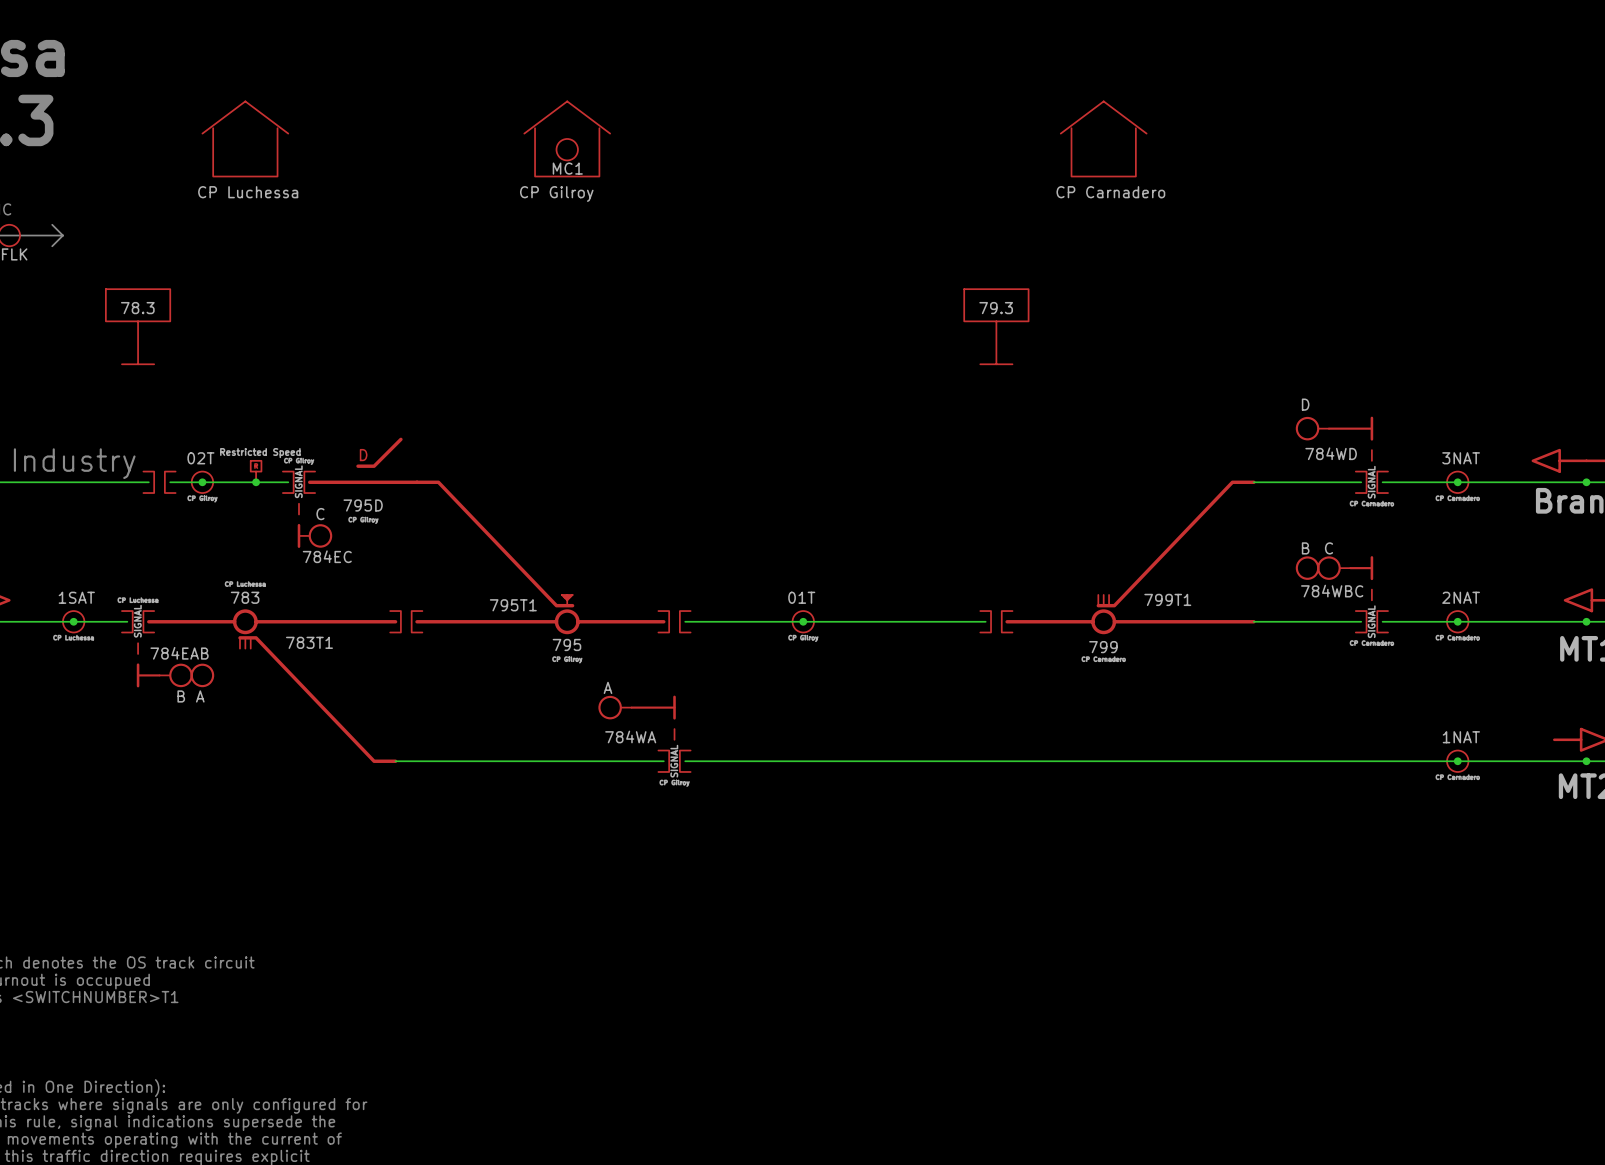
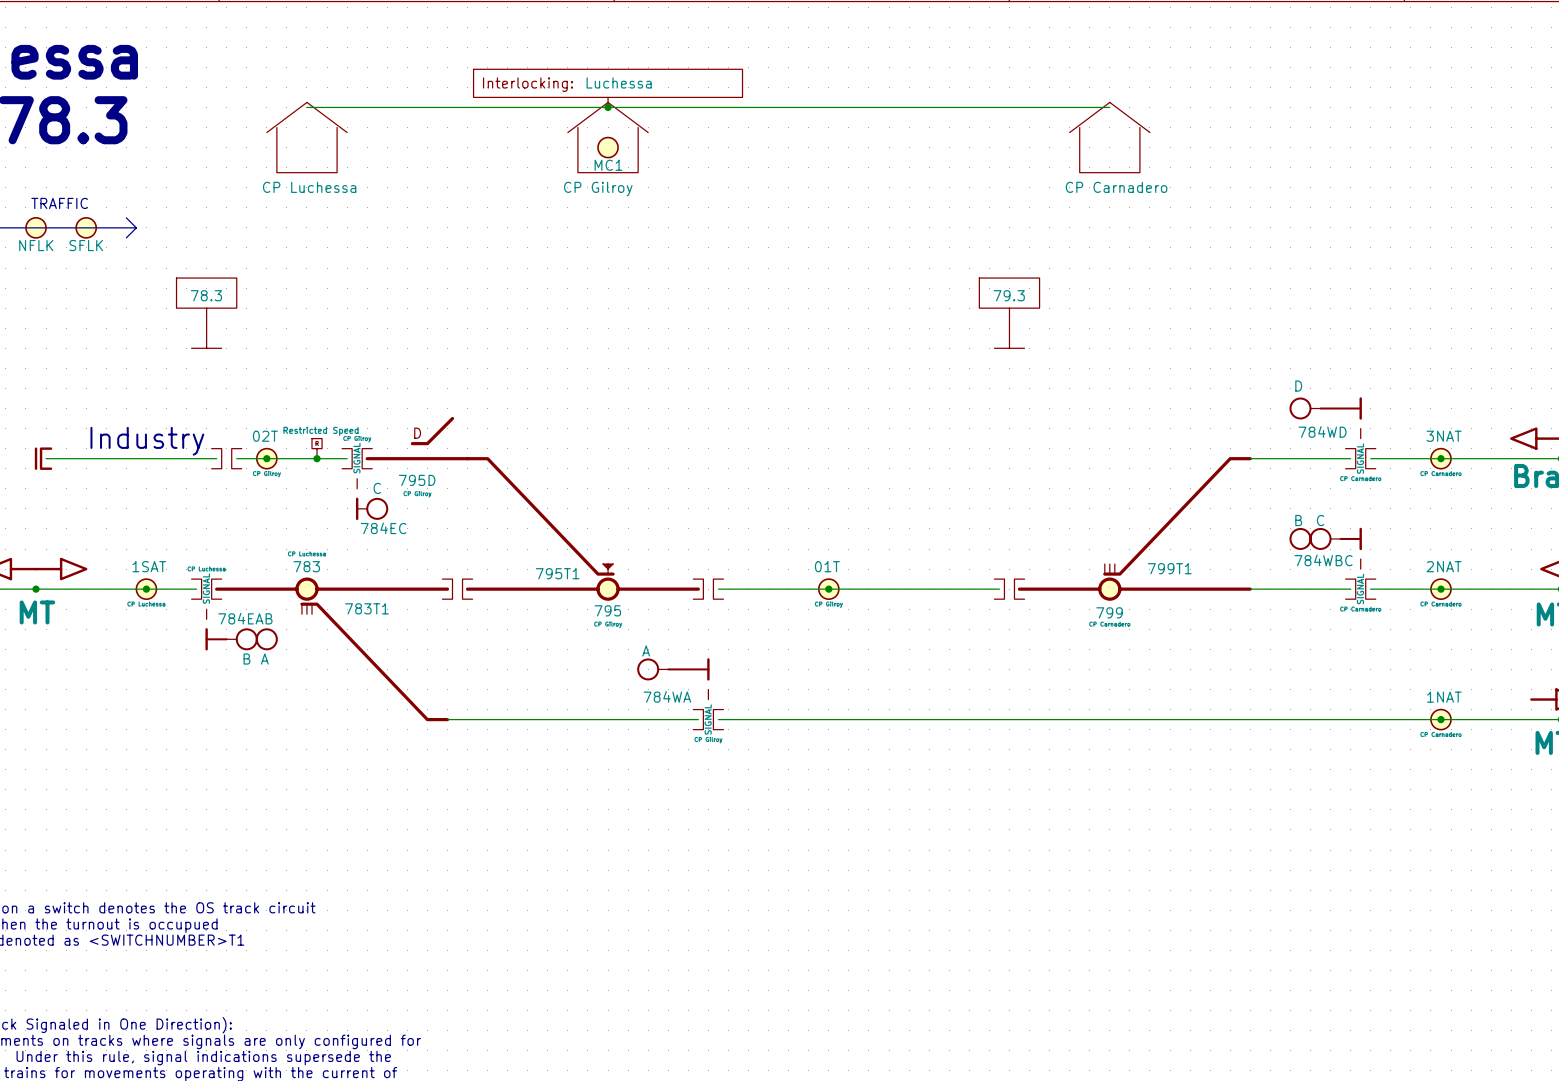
part: none -> Luchessa (608, 88)
wire: none -> (306, 107) (1109, 107)
junction: none -> (608, 107)

